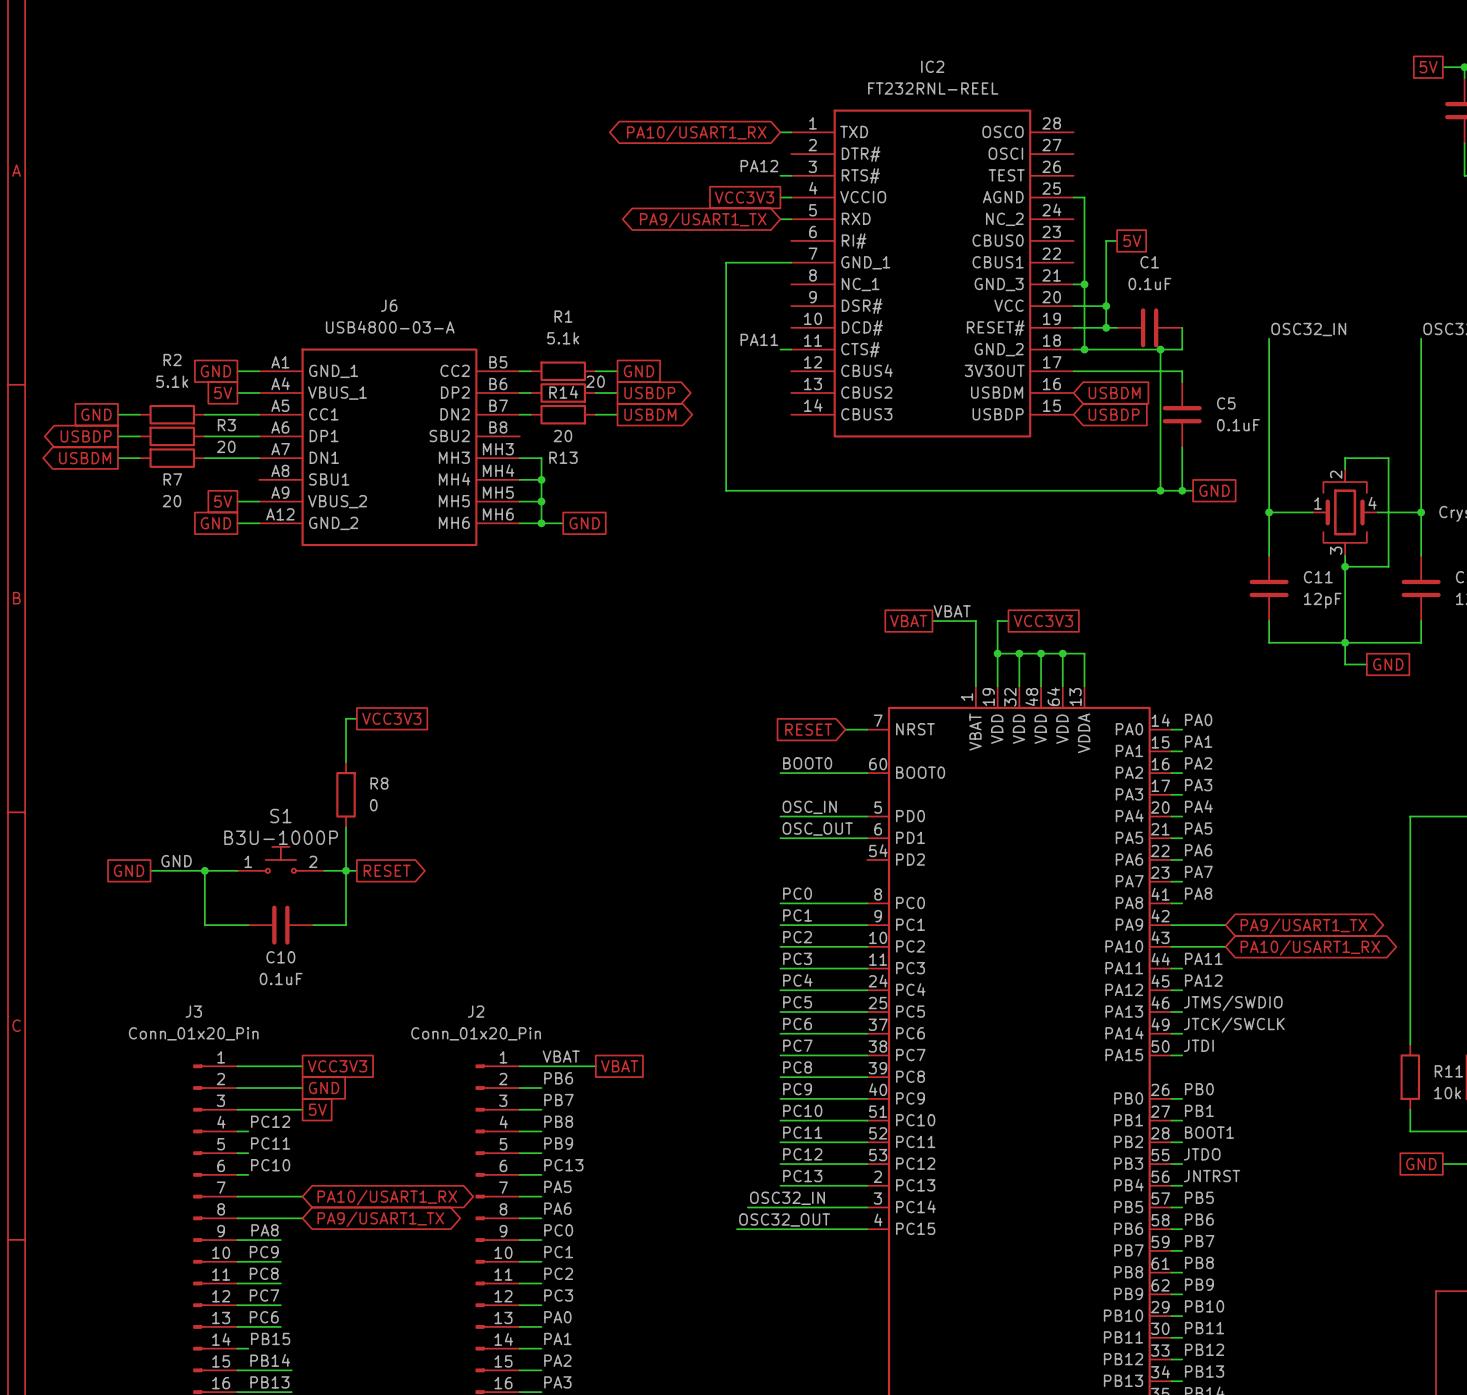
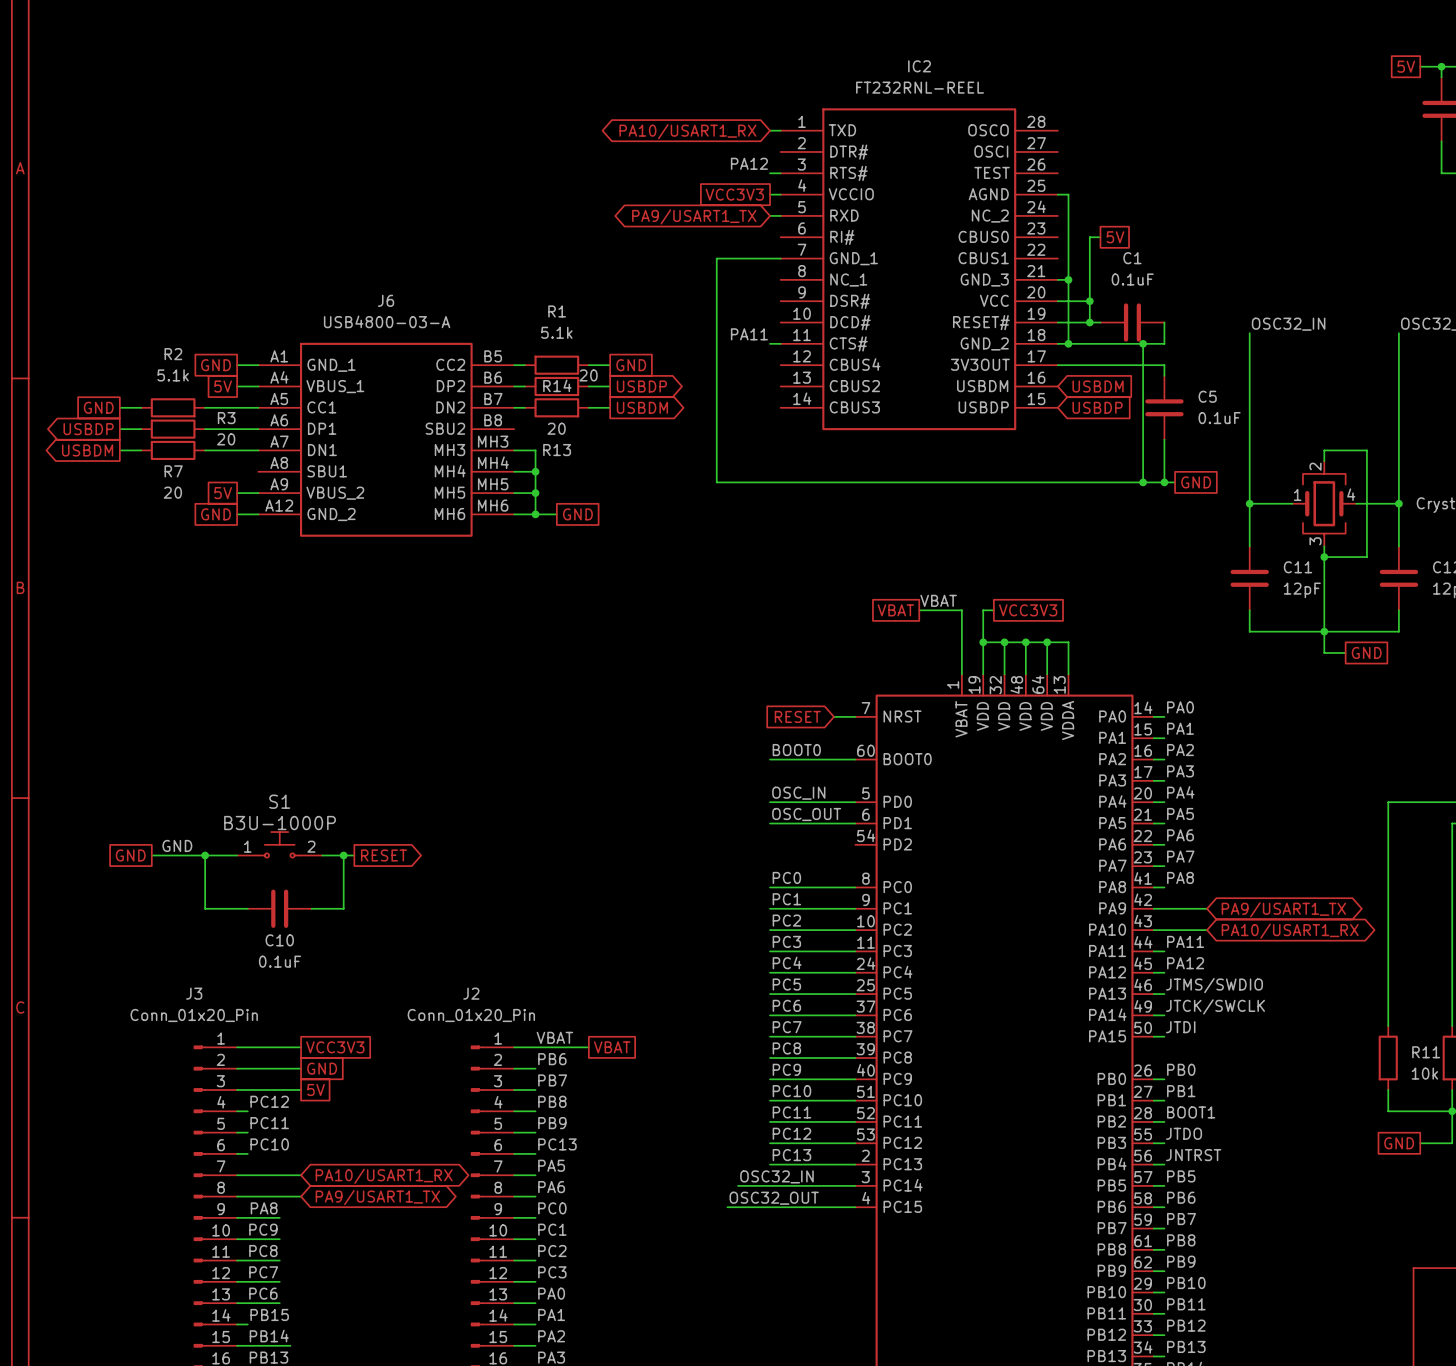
wire: (356, 718) (346, 718) (346, 762) -> none
global label: VCC3V3 (391, 718) -> none
R8: 0 (346, 794) -> none
wire: (346, 827) (346, 870) -> none

